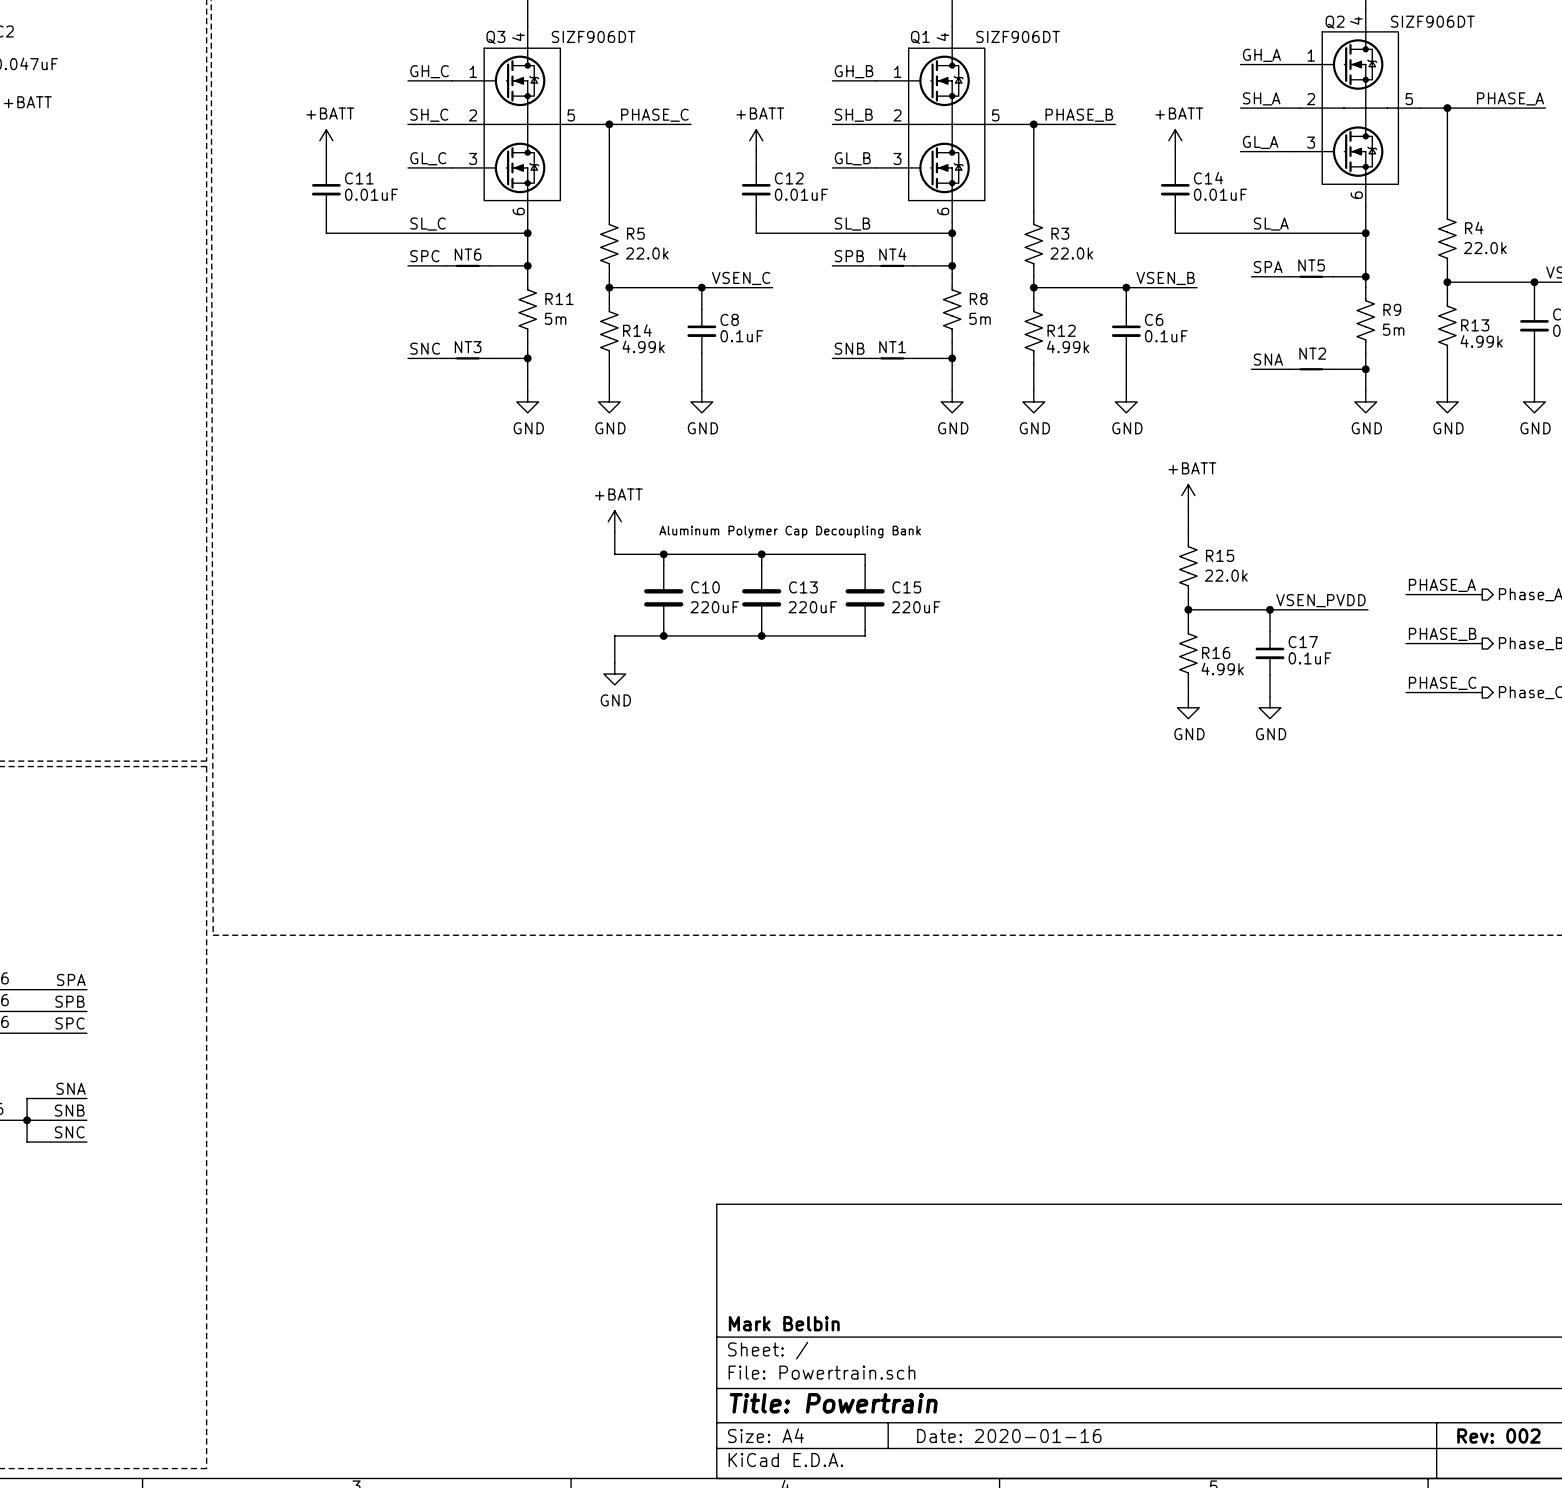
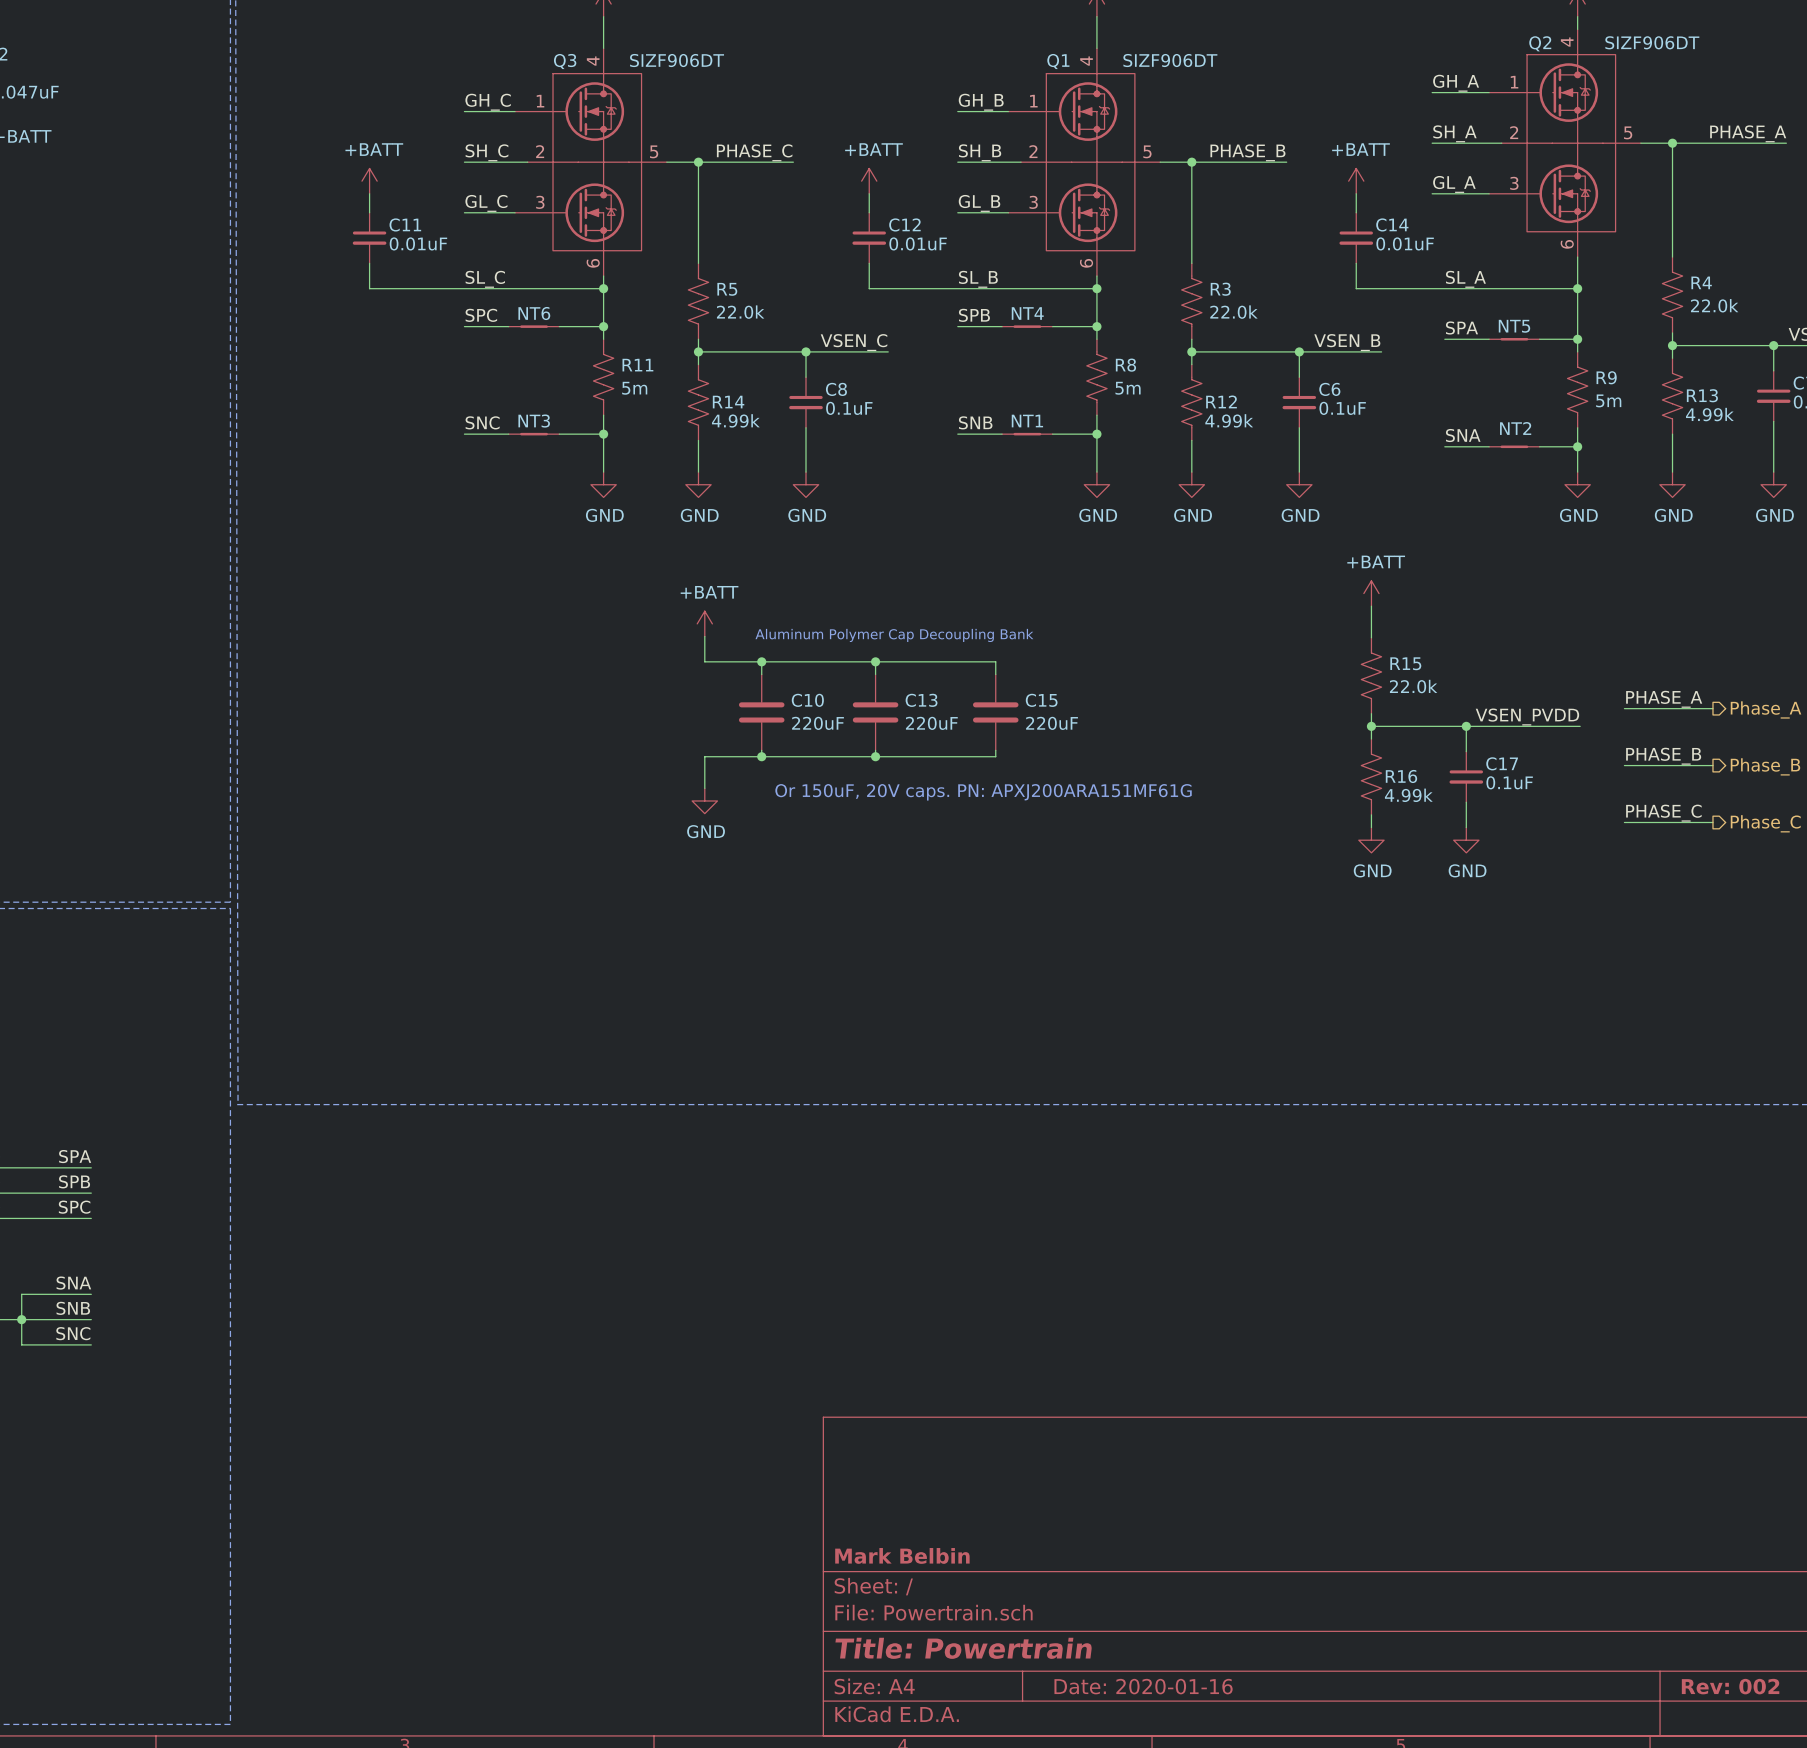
text: none -> Or 150uF, 20V caps. PN: APXJ200ARA151MF61G (983, 792)

